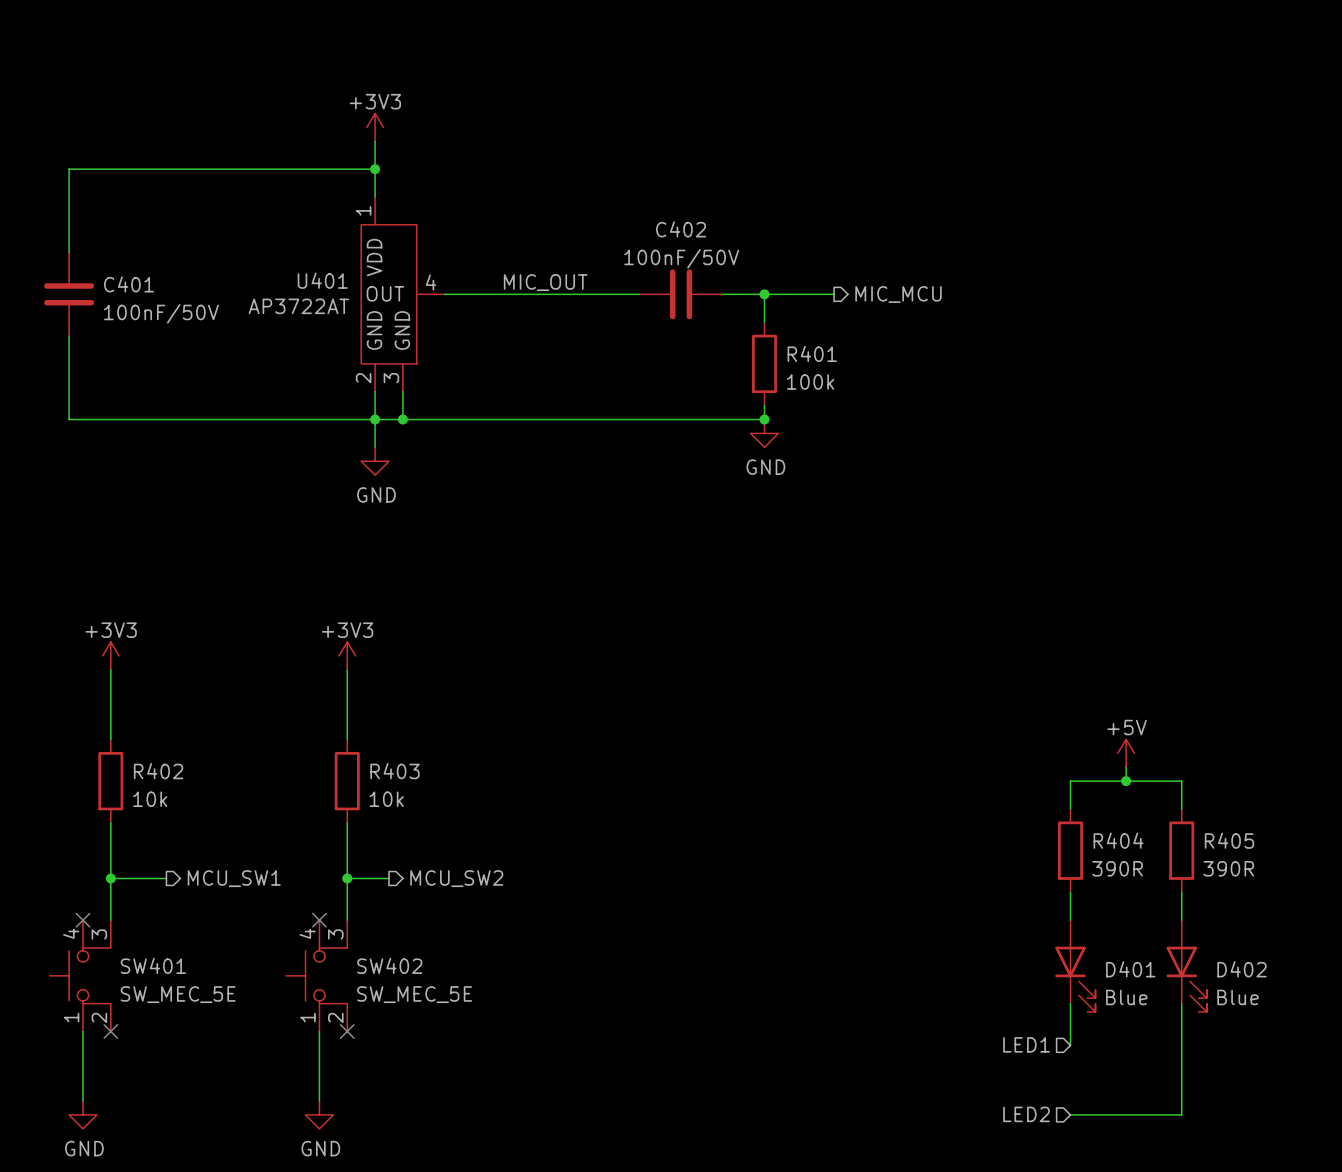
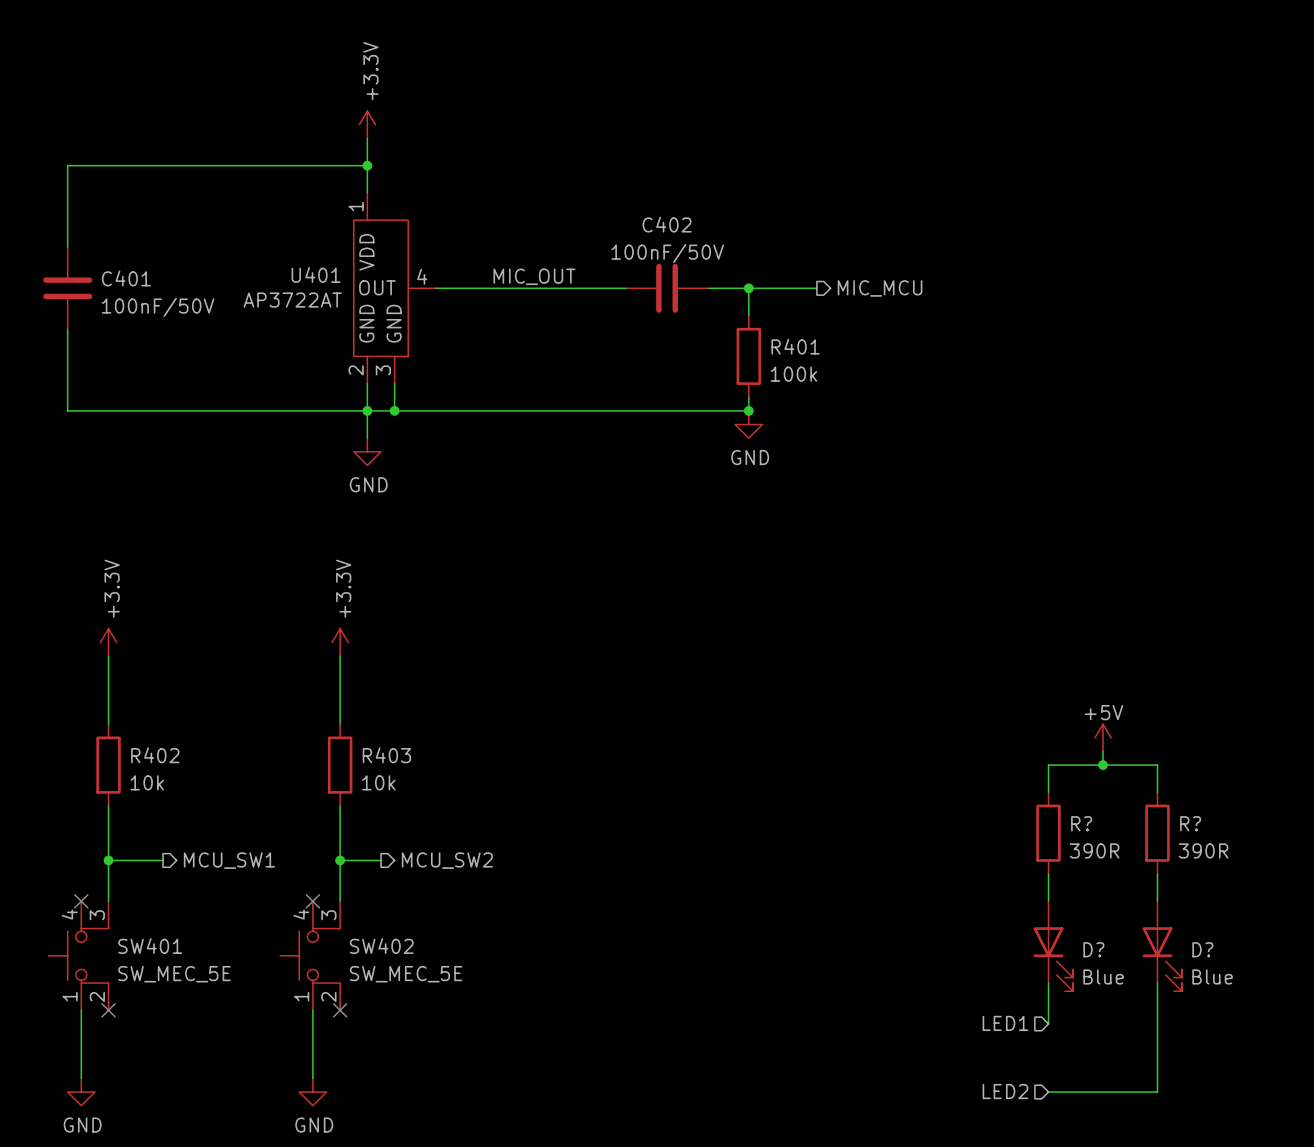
power symbol: +3V3 (375, 127) -> +3.3V (367, 124)
power symbol: +3V3 (110, 655) -> +3.3V (108, 642)
power symbol: +3V3 (347, 655) -> +3.3V (340, 642)
R404 name: R404 (1118, 840) -> R? (1081, 823)
R405 name: R405 (1229, 840) -> R? (1190, 823)
D401 name: D401 (1130, 969) -> D? (1093, 949)
D402 name: D402 (1241, 969) -> D? (1202, 949)

